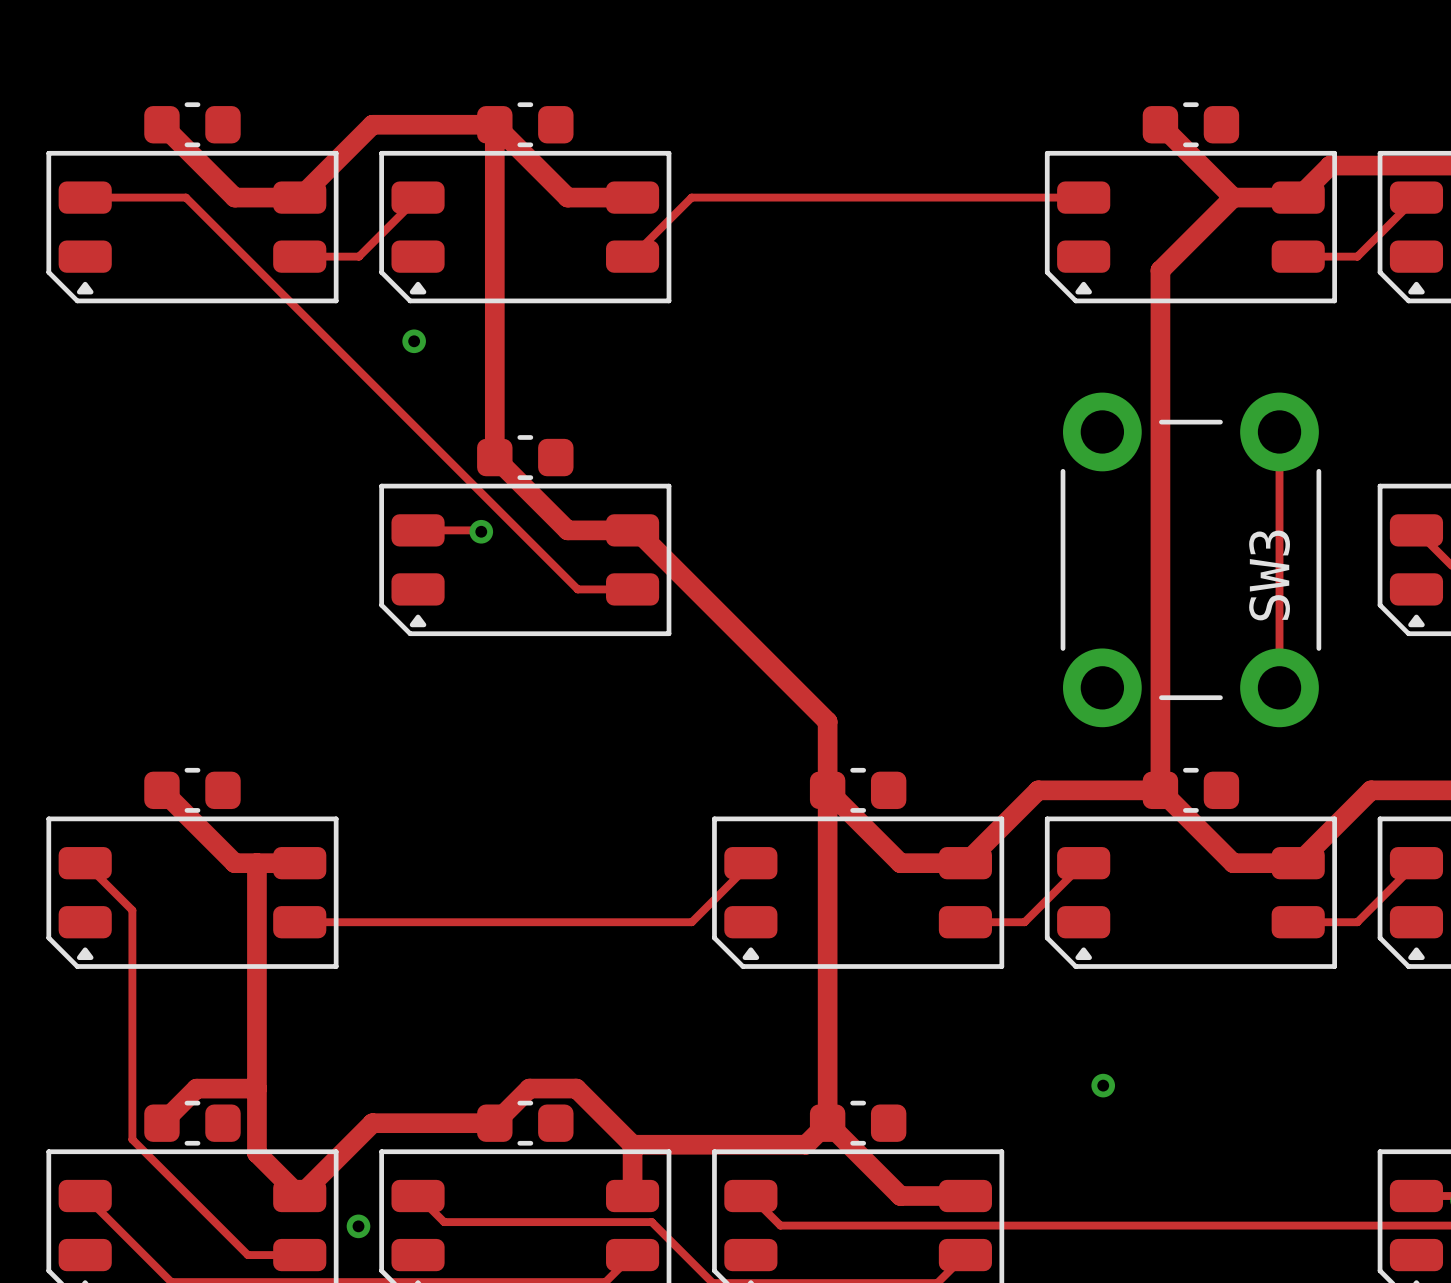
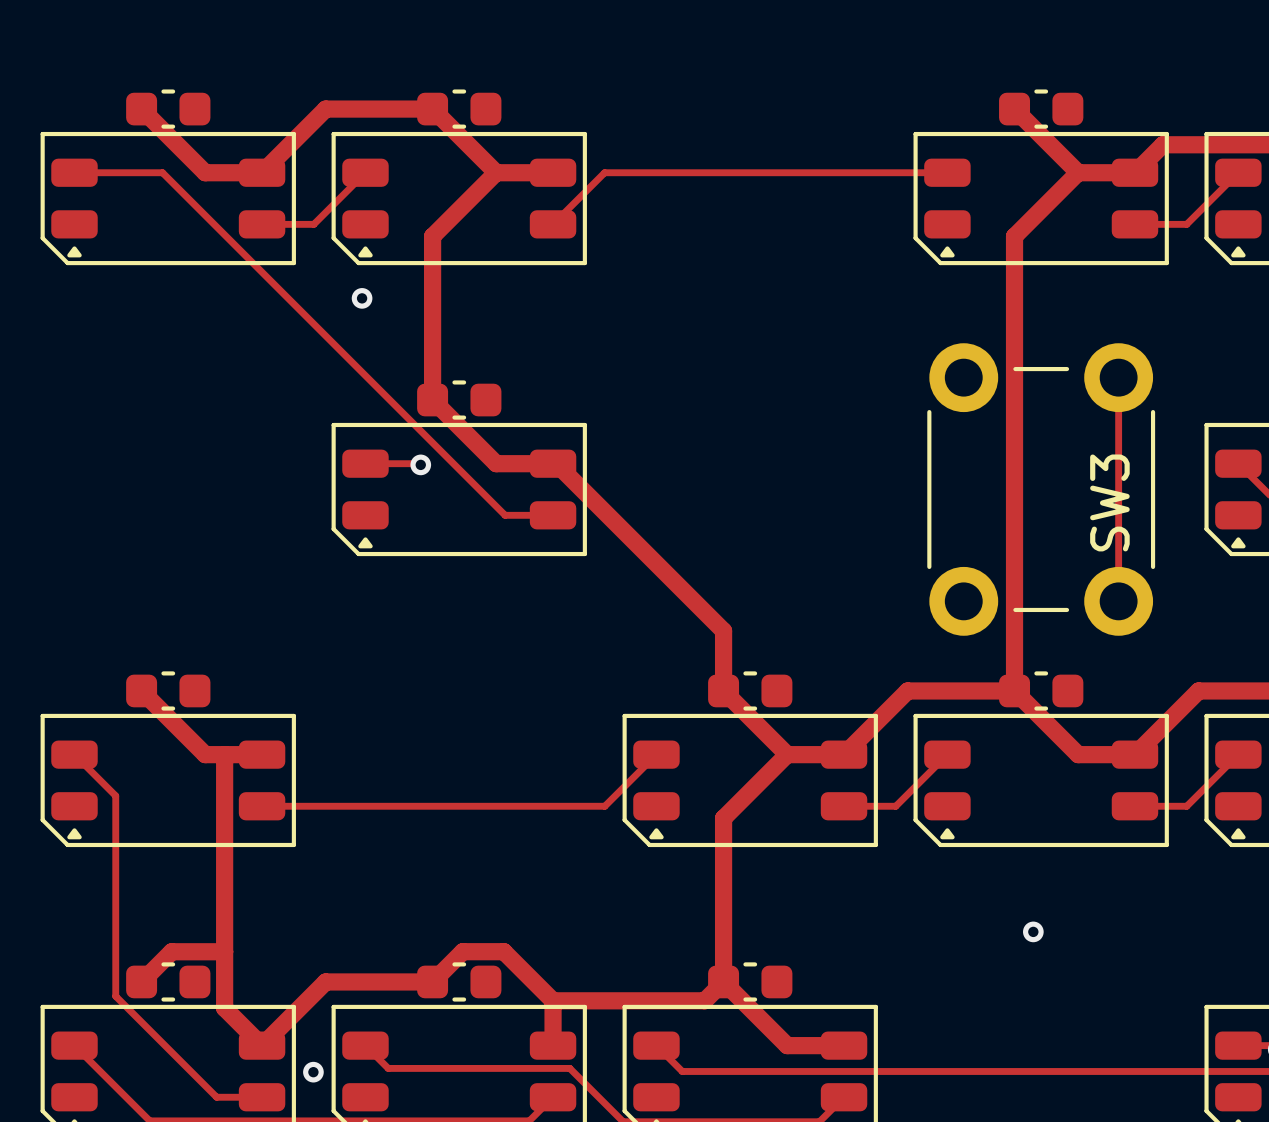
track: (494, 124) (494, 270) -> (496, 172) (432, 236)
track: (827, 790) (827, 936) -> (787, 754) (723, 818)
via position: (1103, 1085) -> (1033, 931)

